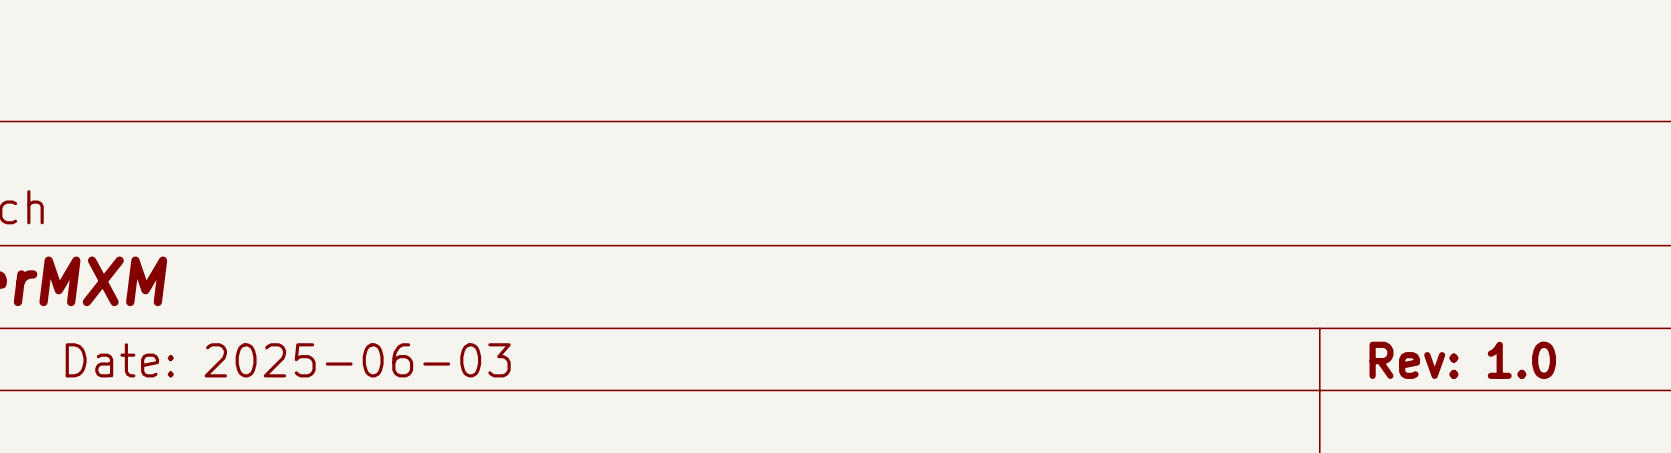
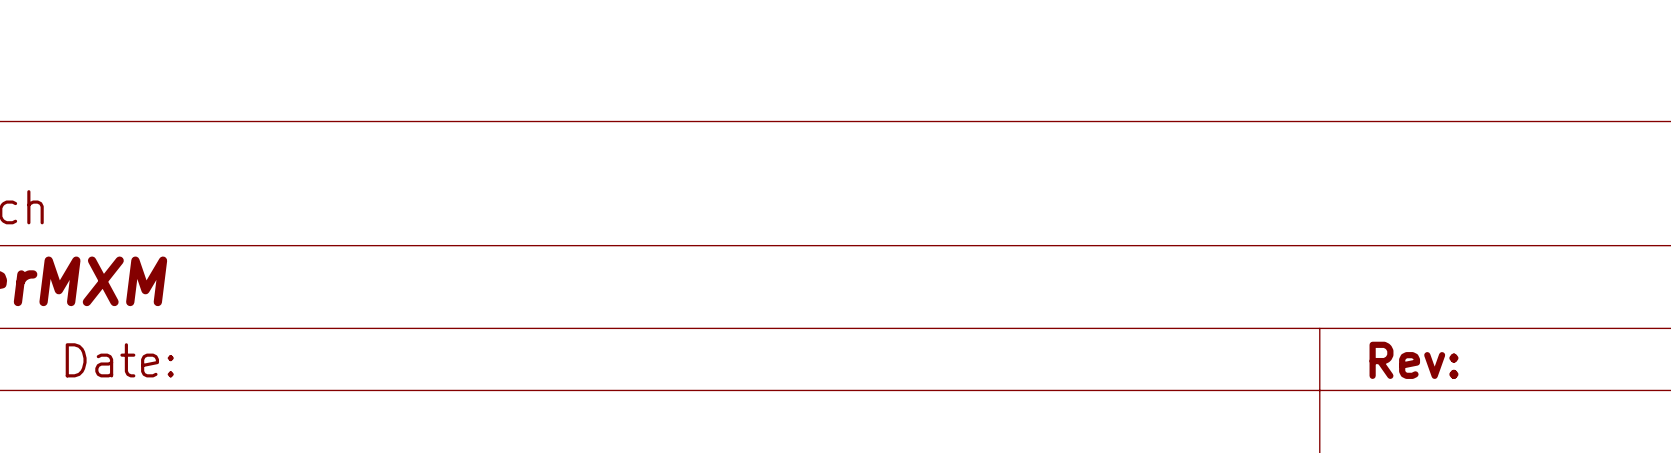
title block: Date: 2025-06-03 (288, 360) -> Date: (119, 360)
title block: Rev: 1.0 (1462, 360) -> Rev: (1414, 360)

